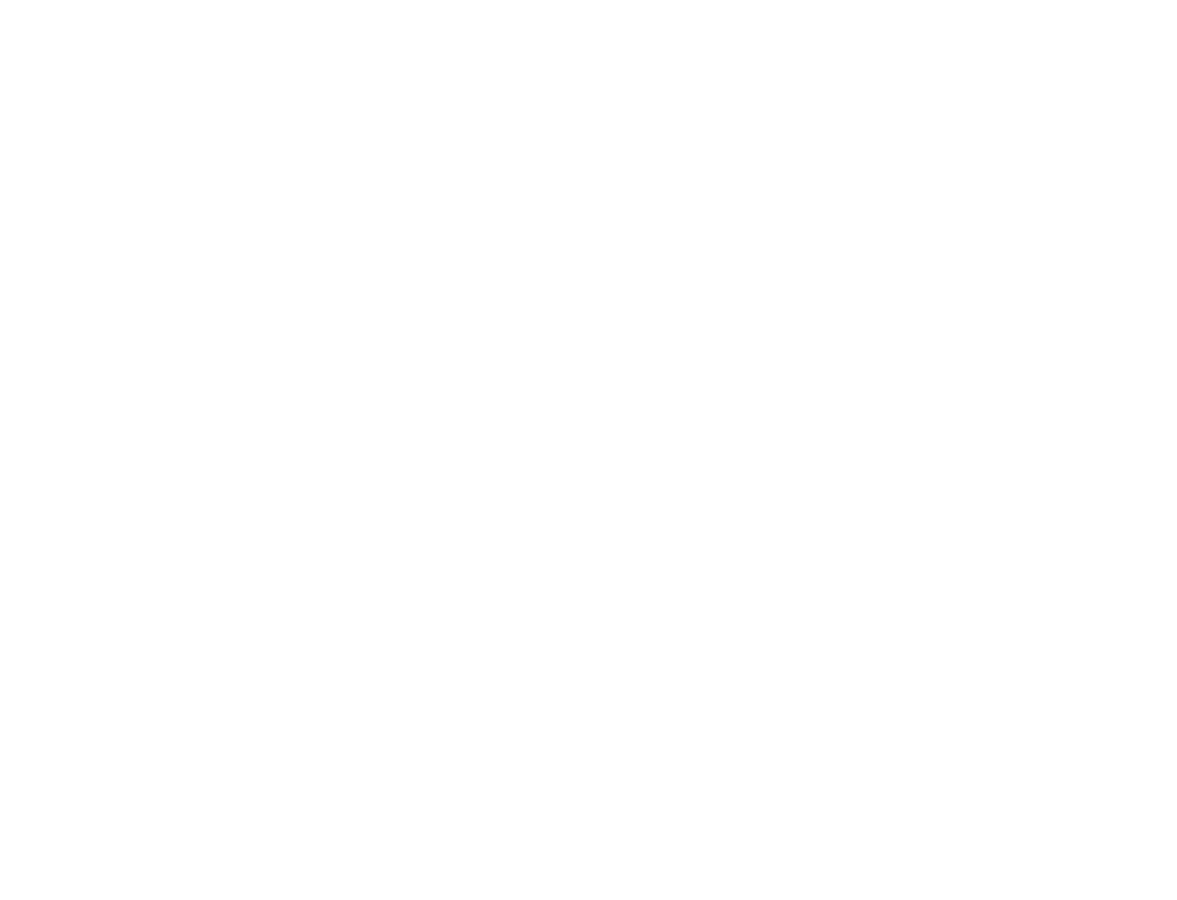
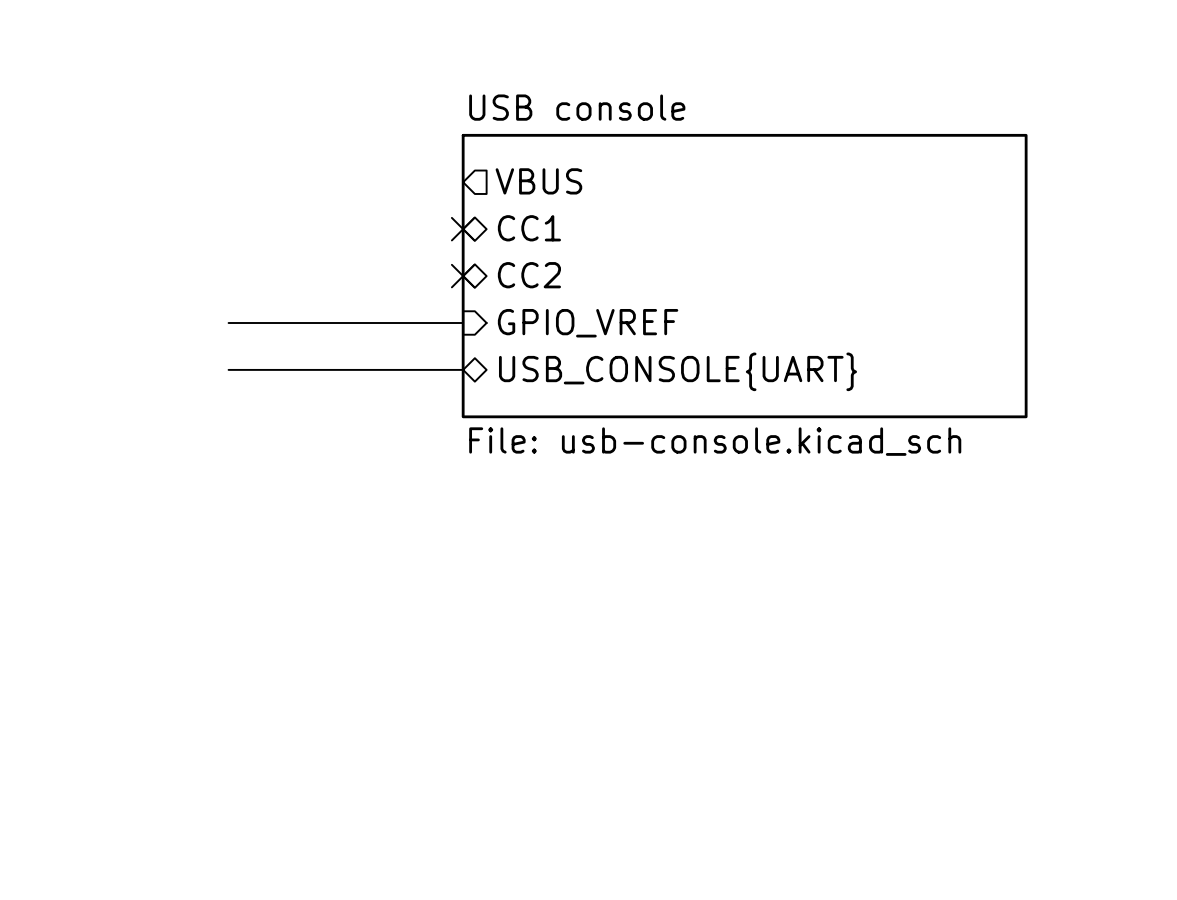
sheet pin: none -> VBUS (538, 181)
sheet pin: none -> CC1 (529, 228)
no-connect mark: none -> (463, 229)
sheet pin: none -> CC2 (529, 275)
no-connect mark: none -> (463, 276)
sheet USB console: none -> File: usb-console.kicad_sch (744, 276)
wire: none -> (228, 323) (463, 323)
sheet pin: none -> GPIO_VREF (588, 323)
bus: none -> (228, 369) (463, 369)
sheet pin: none -> USB_CONSOLE{UART} (677, 371)

